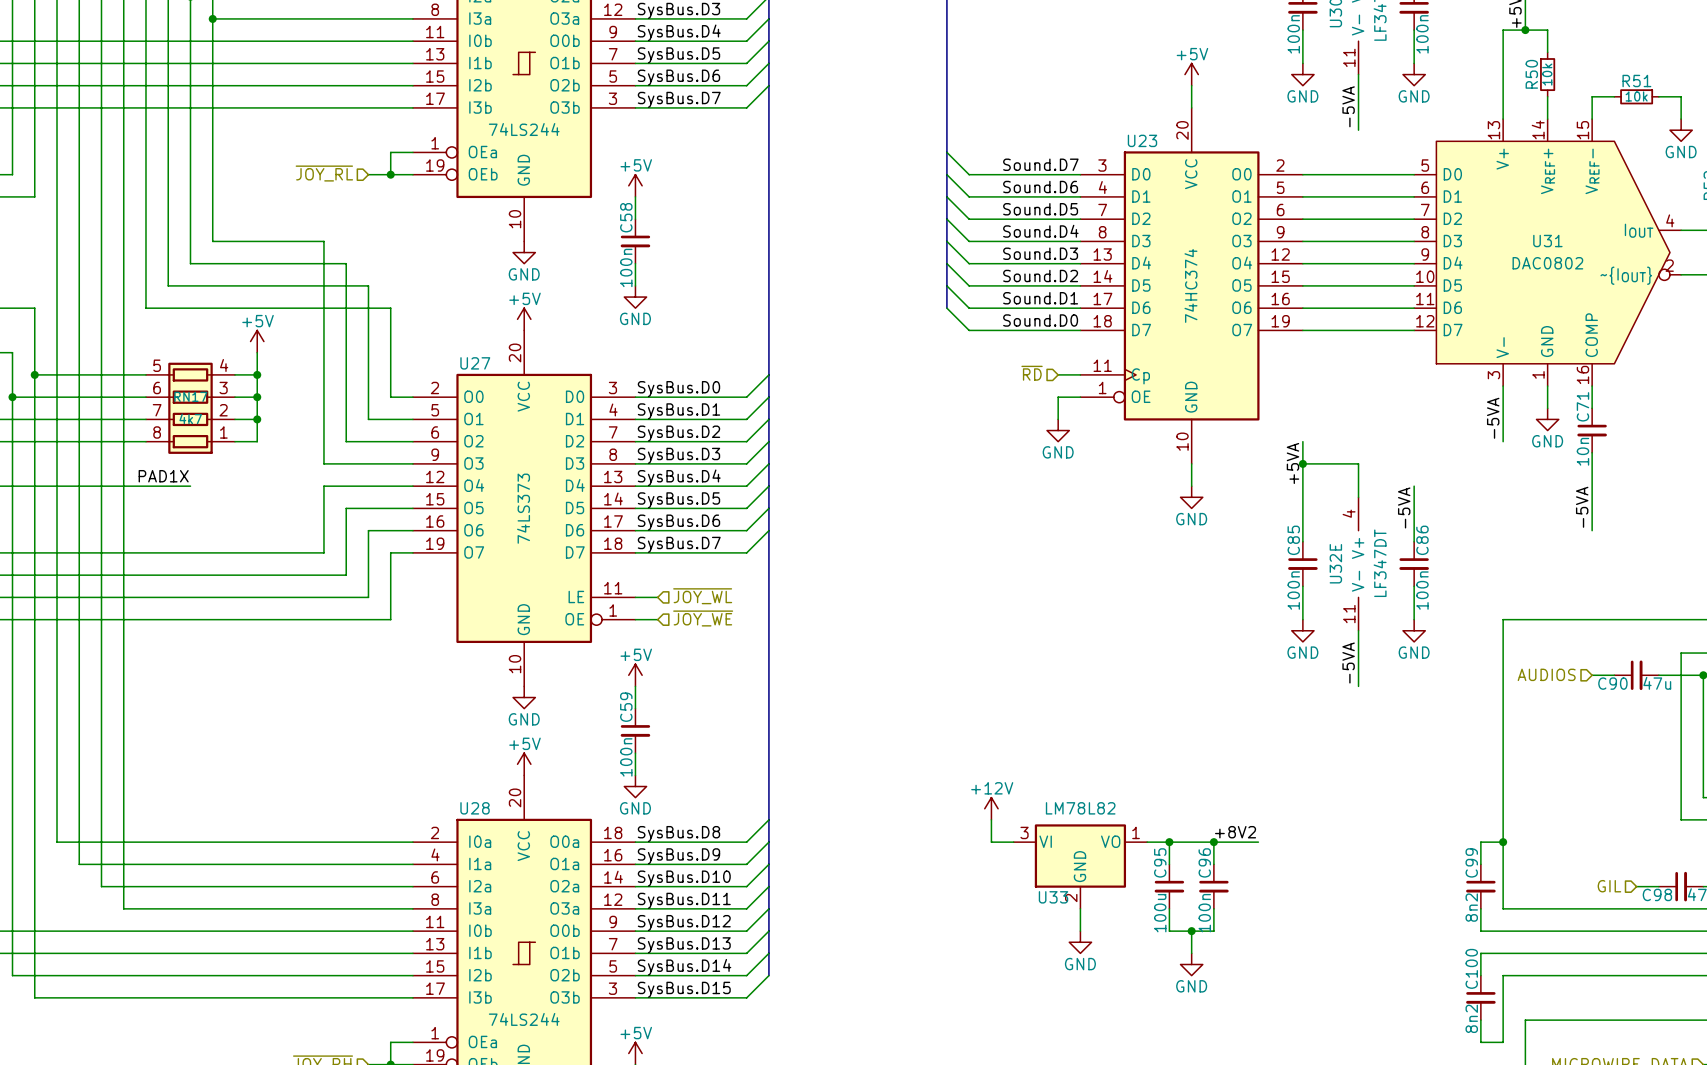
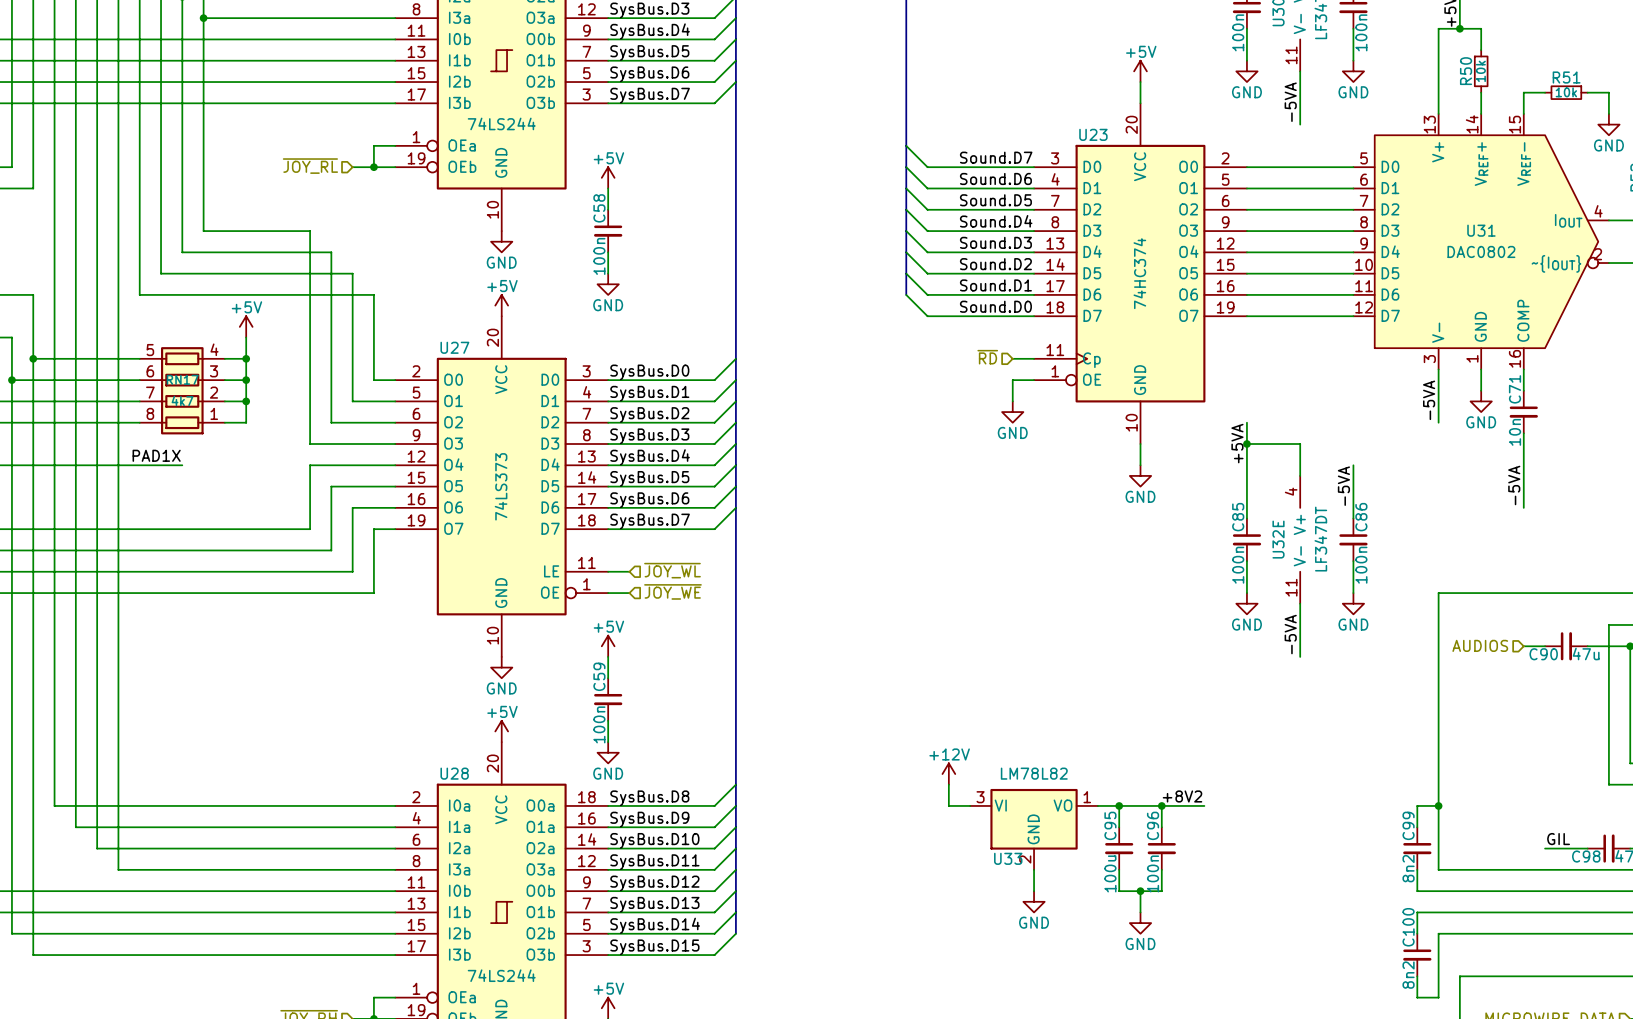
label: none -> GIL (1558, 839)
hierarchical label: GIL (1609, 886) -> none
wire: none -> (1545, 848) (1566, 848)

